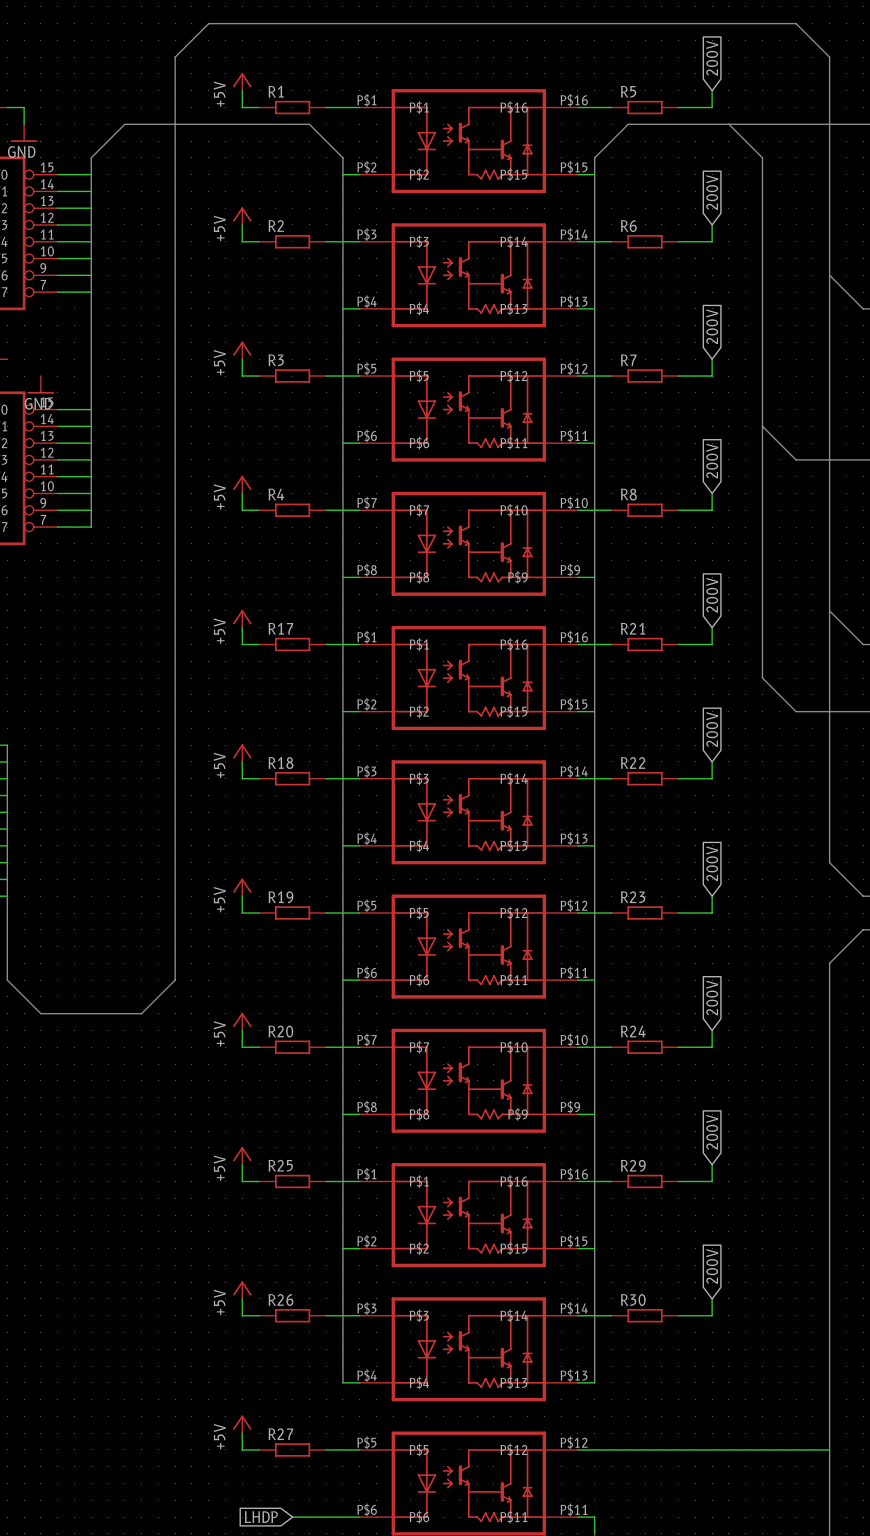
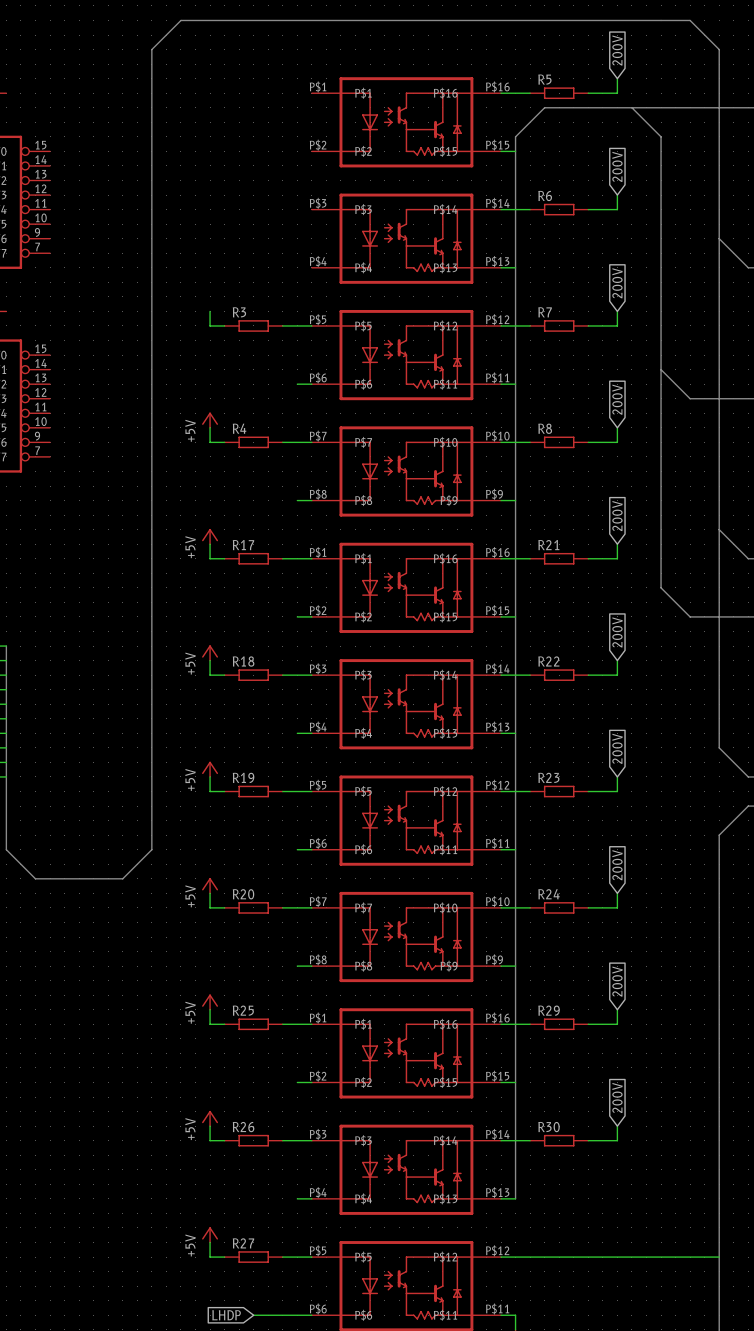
power symbol: +5V (242, 81) -> none
wire: (242, 90) (242, 107) (259, 107) -> none
wire: (7, 107) (24, 107) (24, 124) -> none
R1: (292, 107) -> none
wire: (326, 107) (359, 107) -> none
power symbol: GND (24, 133) -> none
wire: (57, 174) (91, 174) -> none
wire: (342, 174) (359, 174) -> none
wire: (57, 191) (91, 191) -> none
wire: (57, 208) (91, 208) -> none
power symbol: +5V (242, 216) -> none
wire: (57, 224) (91, 224) -> none
wire: (242, 224) (242, 241) (259, 241) -> none
wire: (57, 241) (91, 241) -> none
R2: (292, 241) -> none
wire: (326, 241) (359, 241) -> none
wire: (57, 258) (91, 258) -> none
wire: (57, 275) (91, 275) -> none
wire: (57, 292) (91, 292) -> none
wire: (342, 308) (359, 308) -> none
power symbol: +5V (242, 350) -> none
power symbol: GND (40, 384) -> none
wire: (57, 409) (91, 409) -> none
wire: (57, 426) (91, 426) -> none
wire: (57, 443) (91, 443) -> none
wire: (57, 459) (91, 459) -> none
wire: (57, 476) (91, 476) -> none
wire: (57, 493) (91, 493) -> none
wire: (57, 510) (91, 510) -> none
wire: (57, 527) (91, 527) -> none
bus: (91, 527) (91, 157) (124, 124) (309, 124) (342, 157) (342, 1382) -> none

